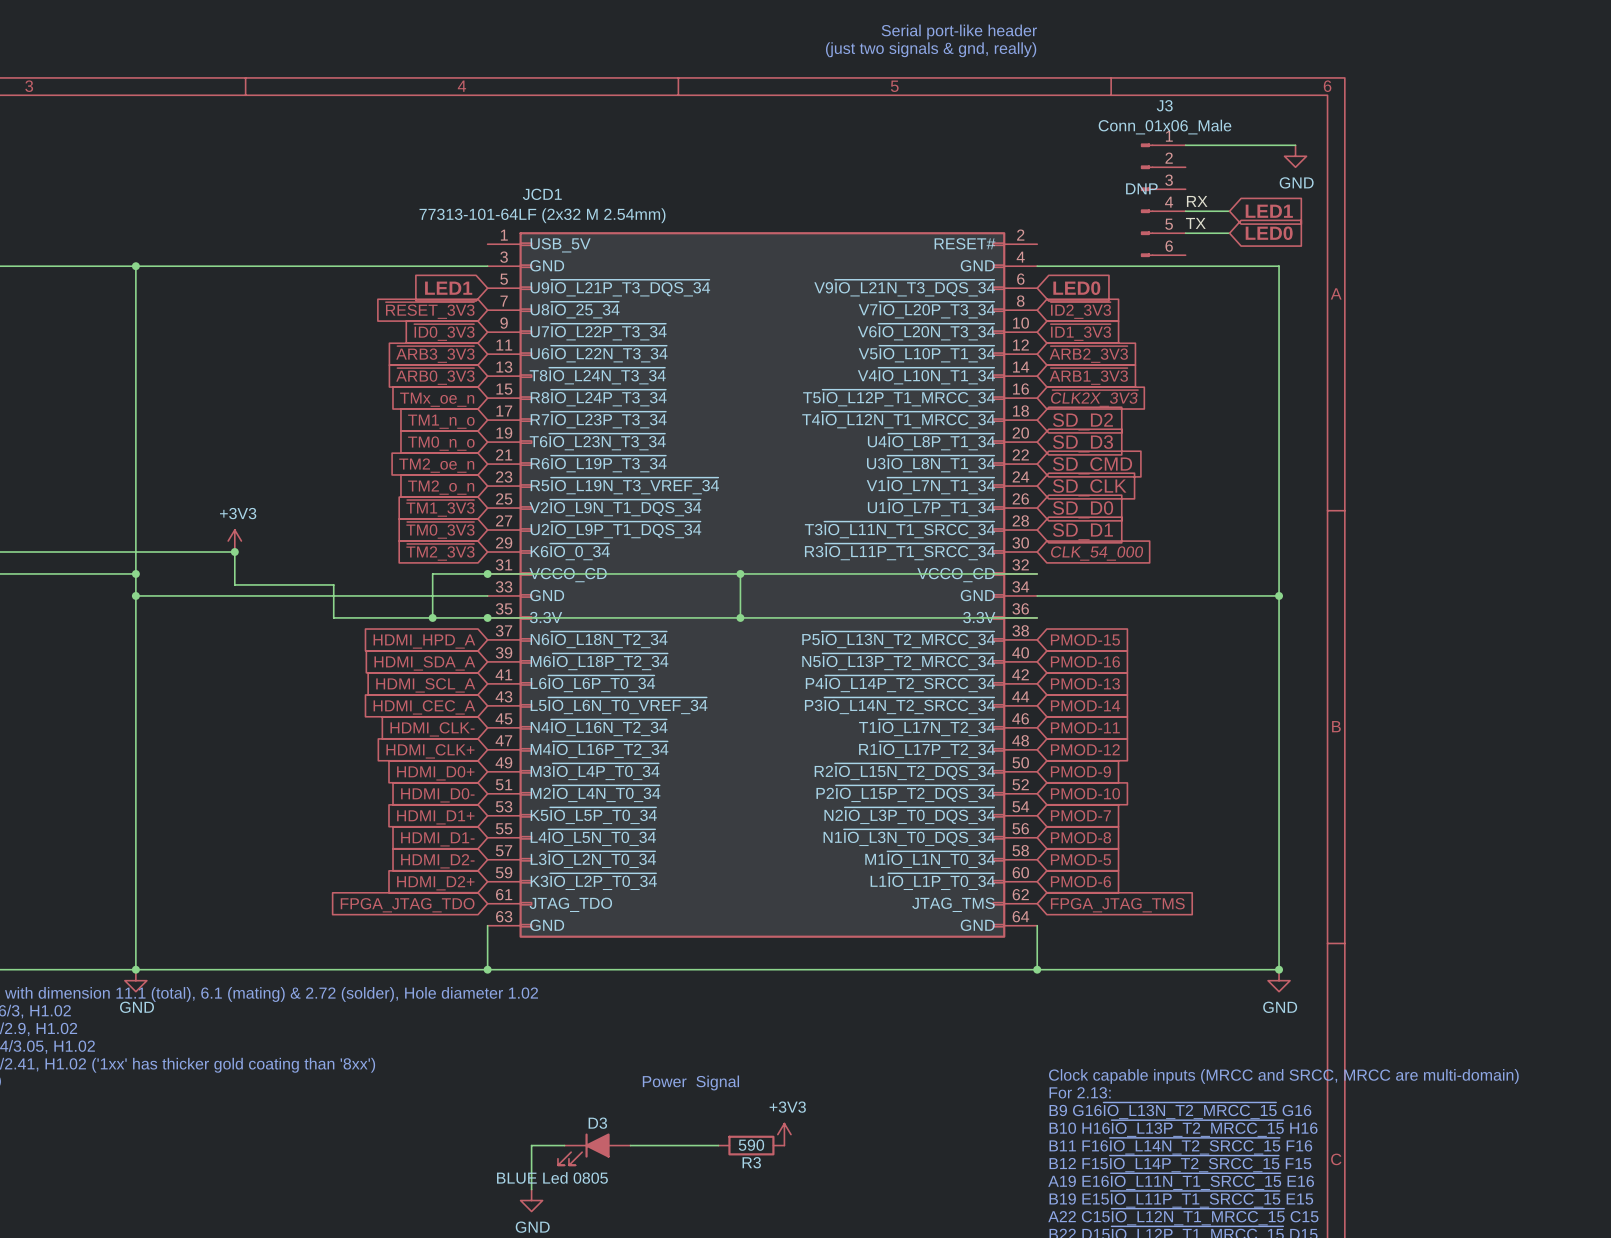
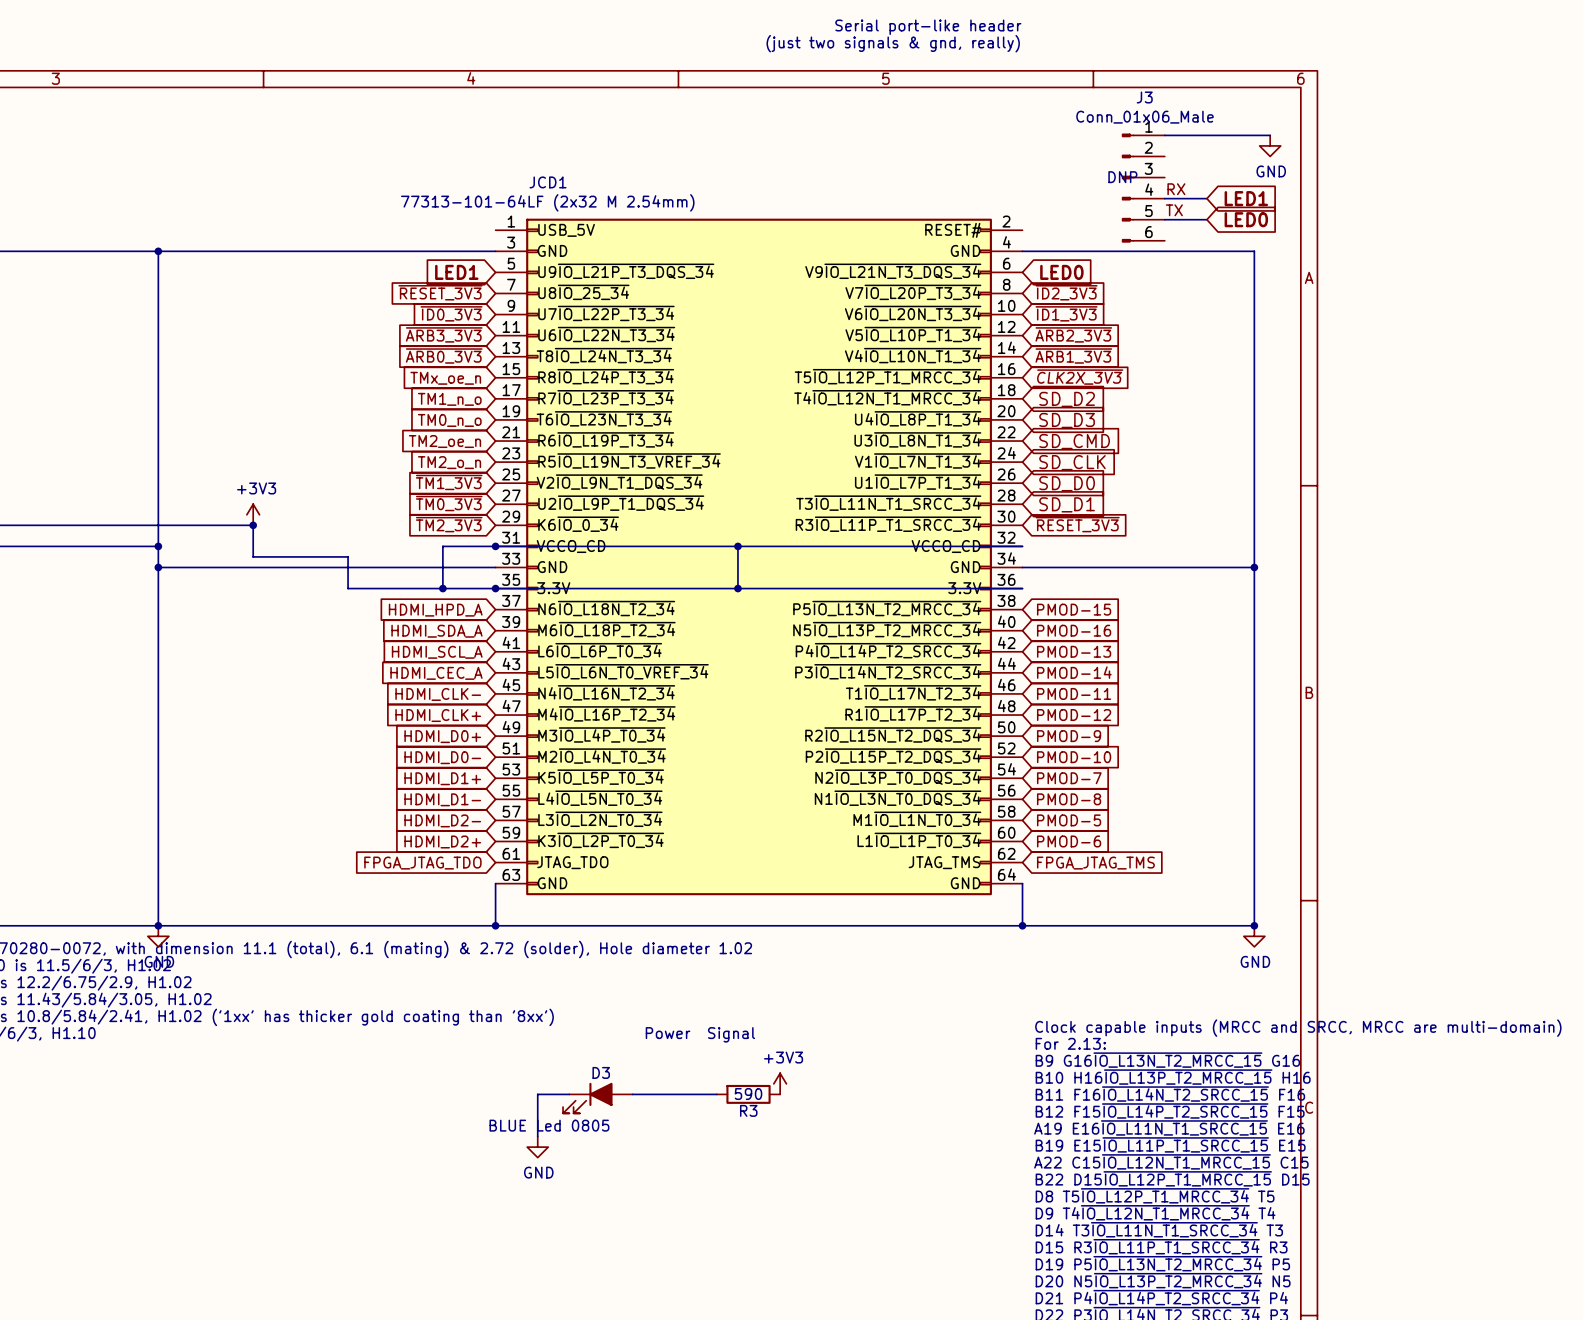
global label: CLK_54_000 (1097, 553) -> ~{RESET_3V3} (1077, 524)

